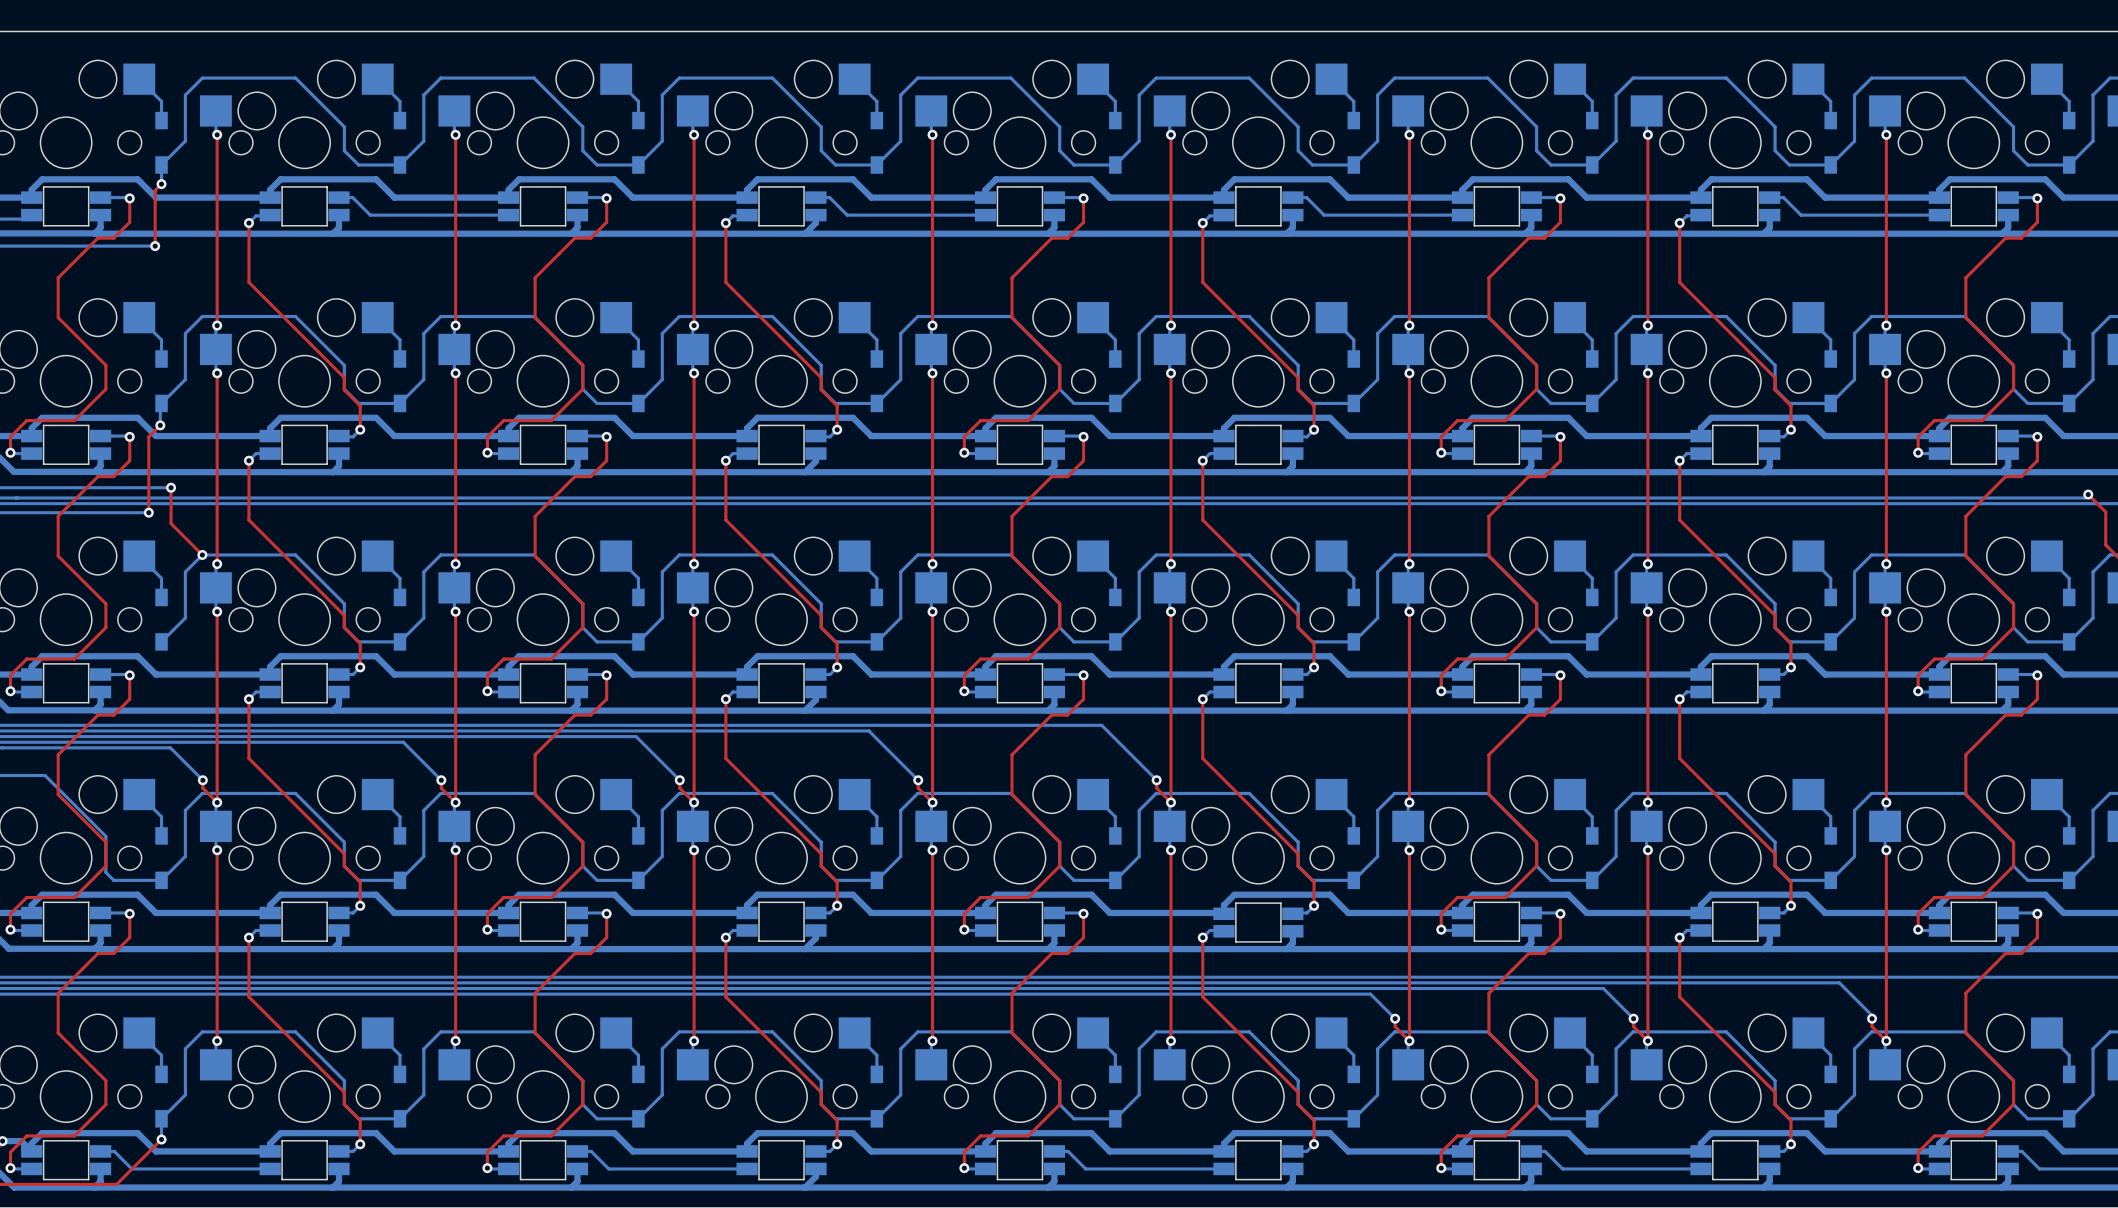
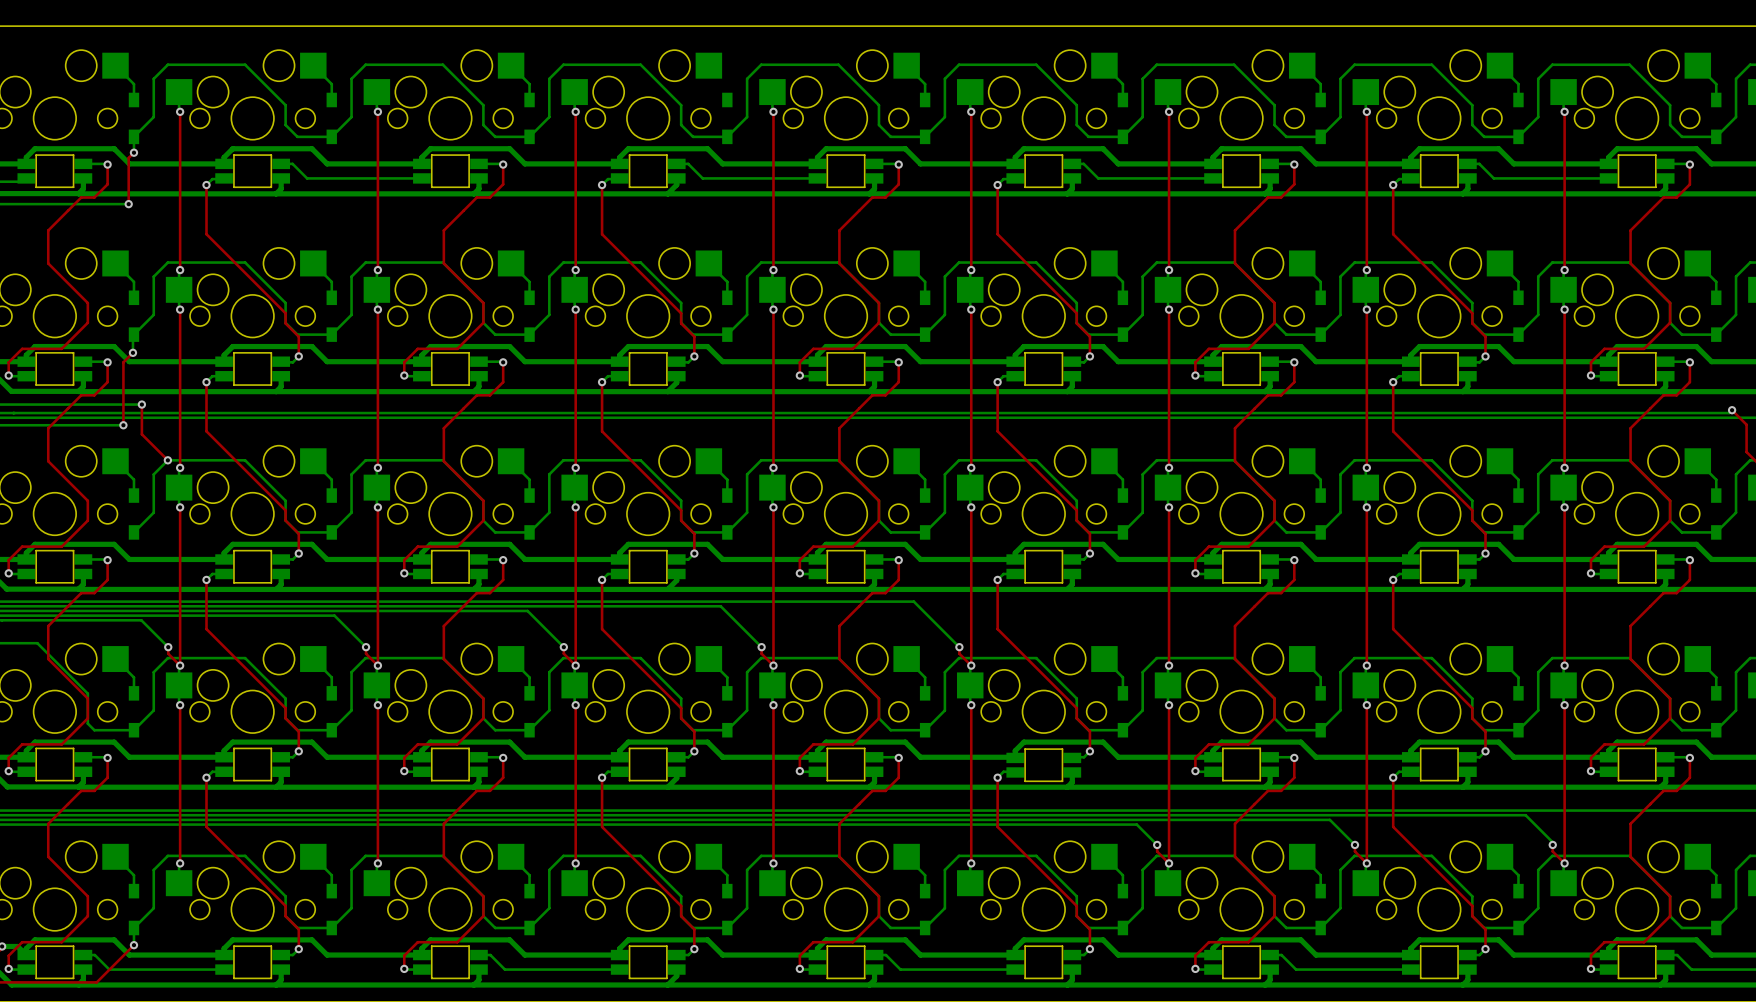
bottom track: (854, 79) (876, 101) (876, 120) -> none

